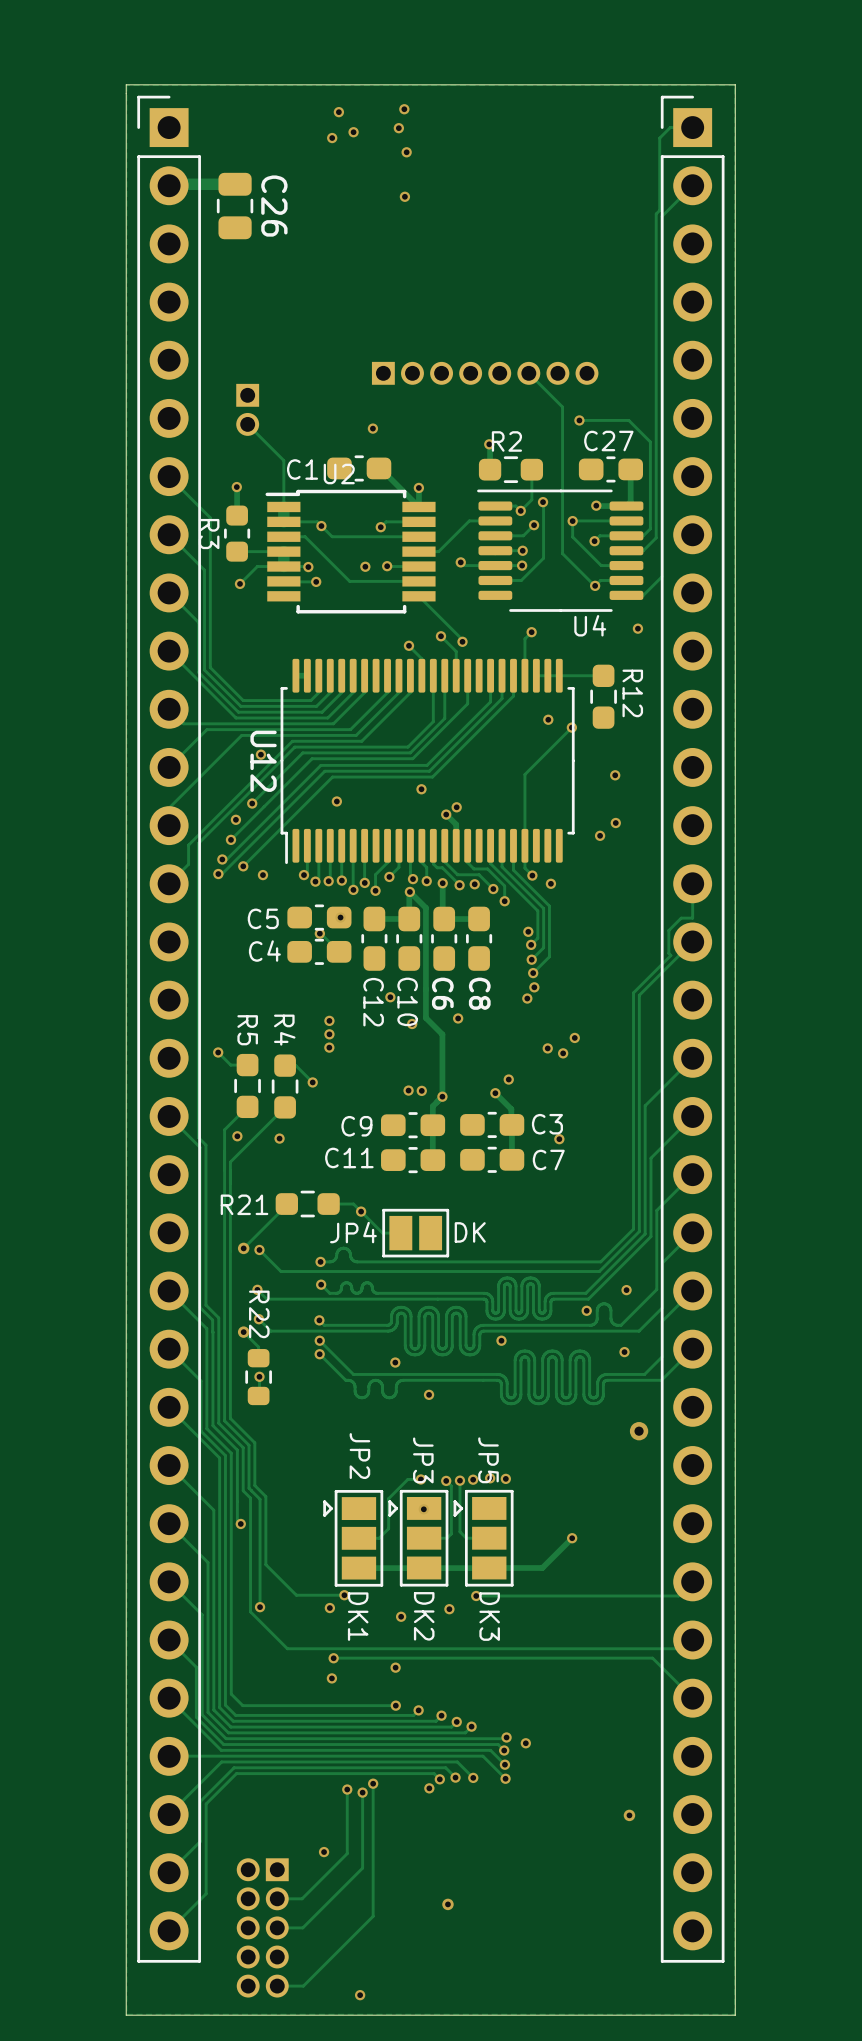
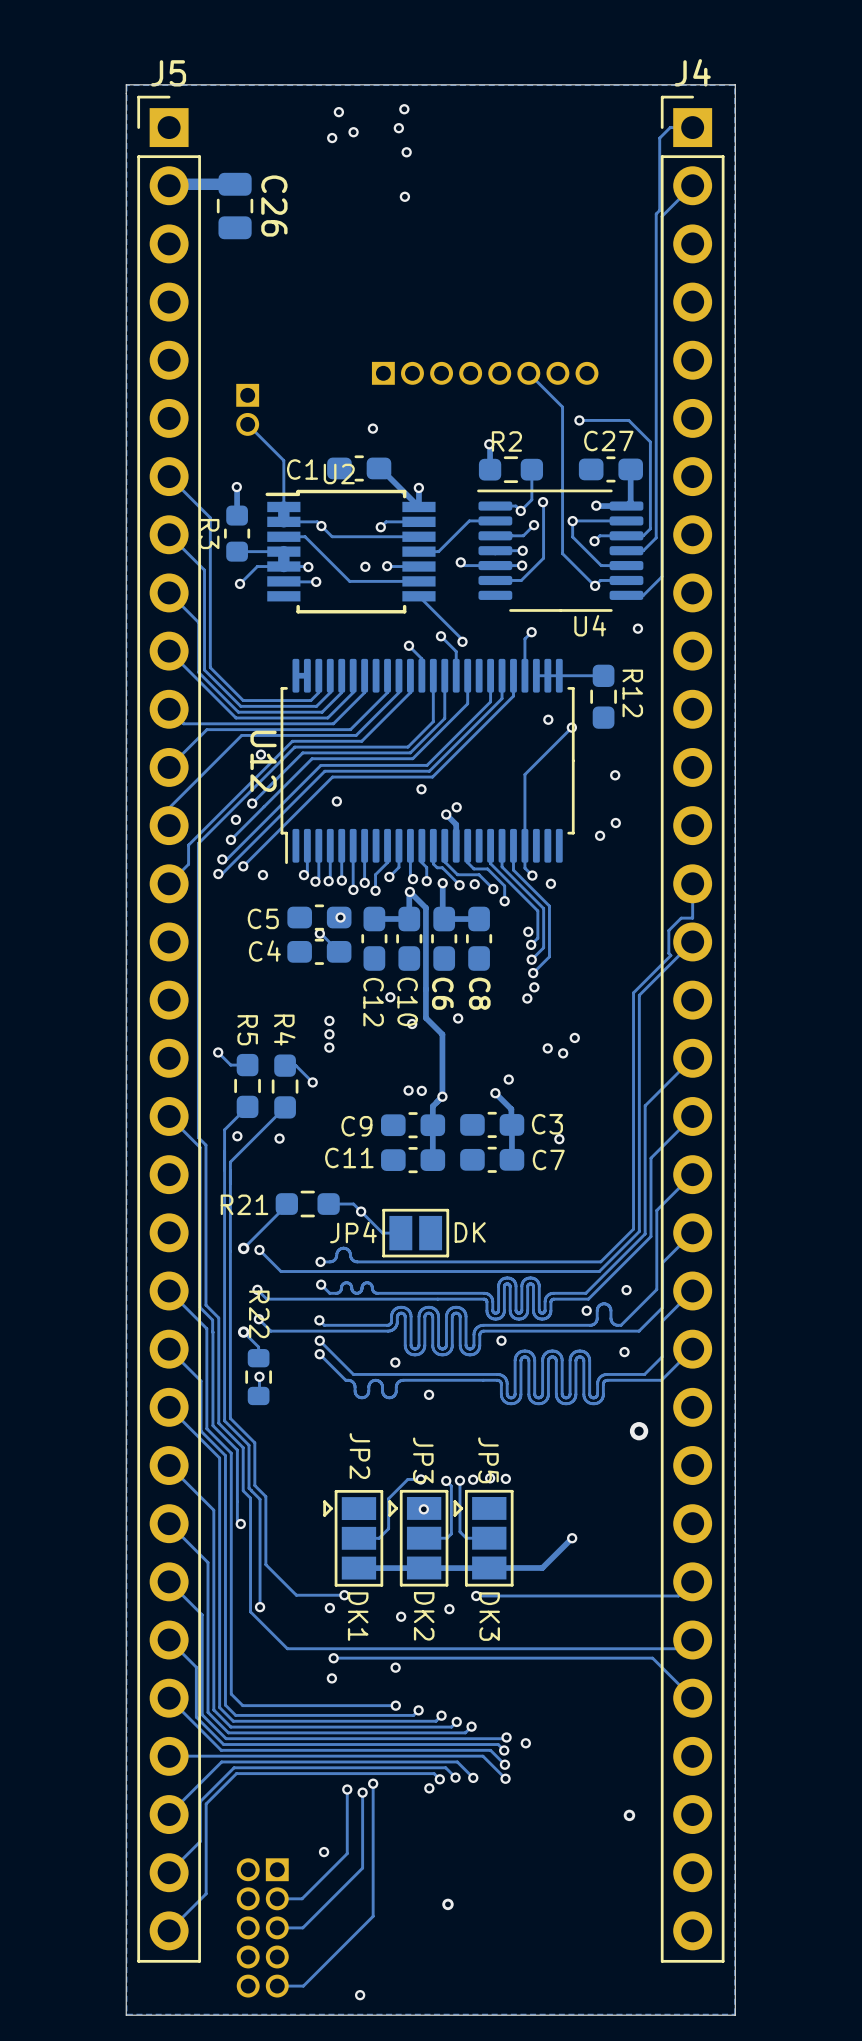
J4 name: none -> J4 (692, 72)
J5 name: none -> J5 (168, 73)

